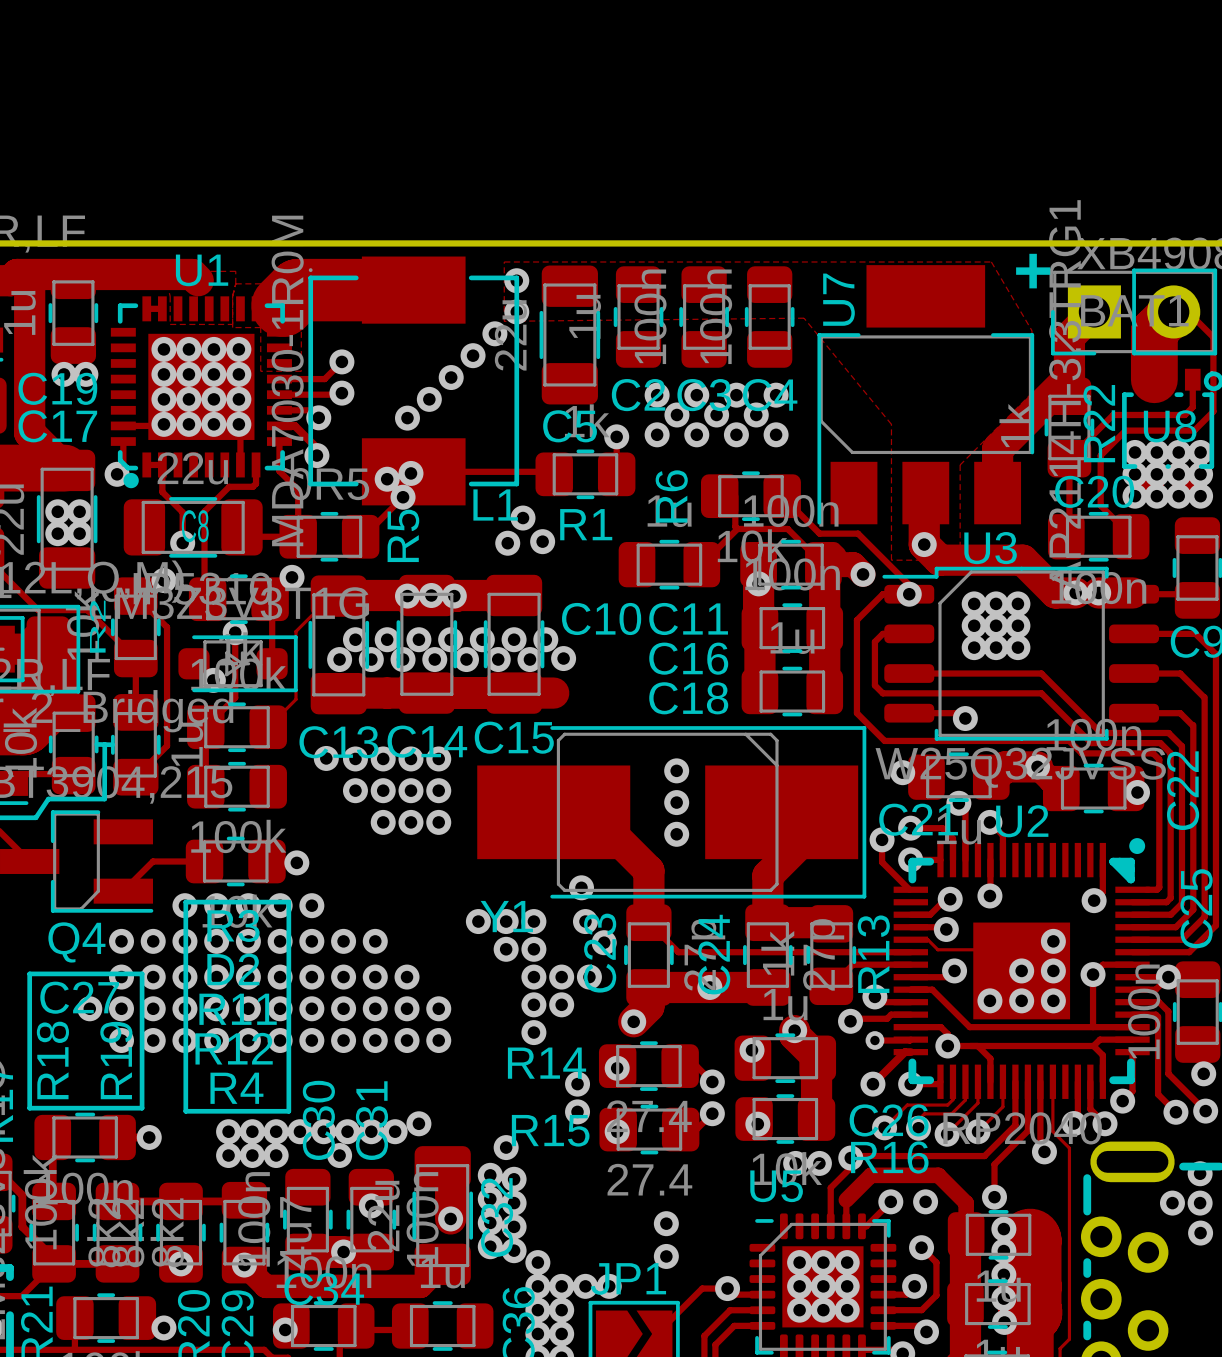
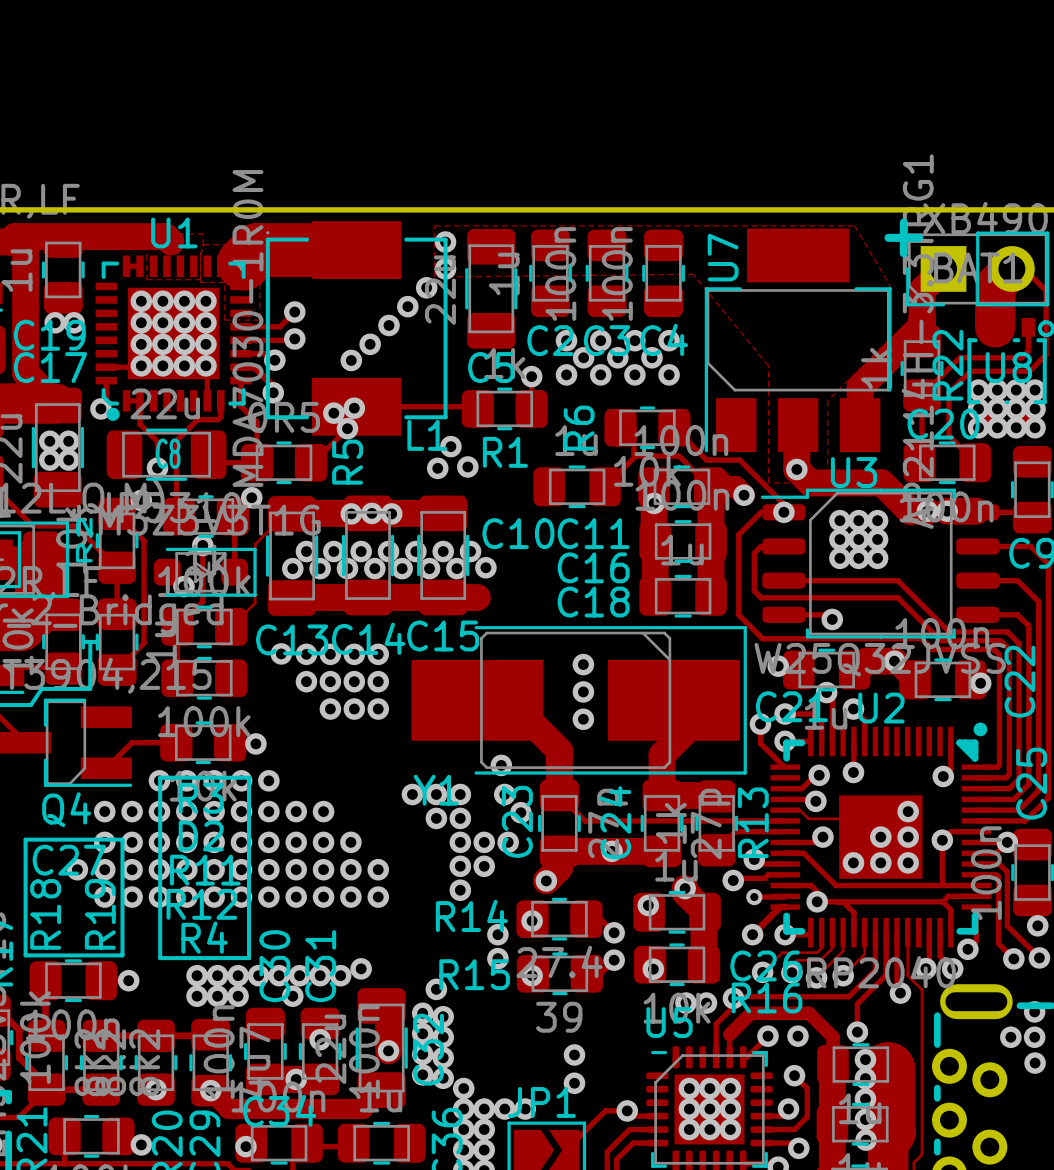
R15 value: 27.4 (649, 1179) -> 39 (559, 1017)

